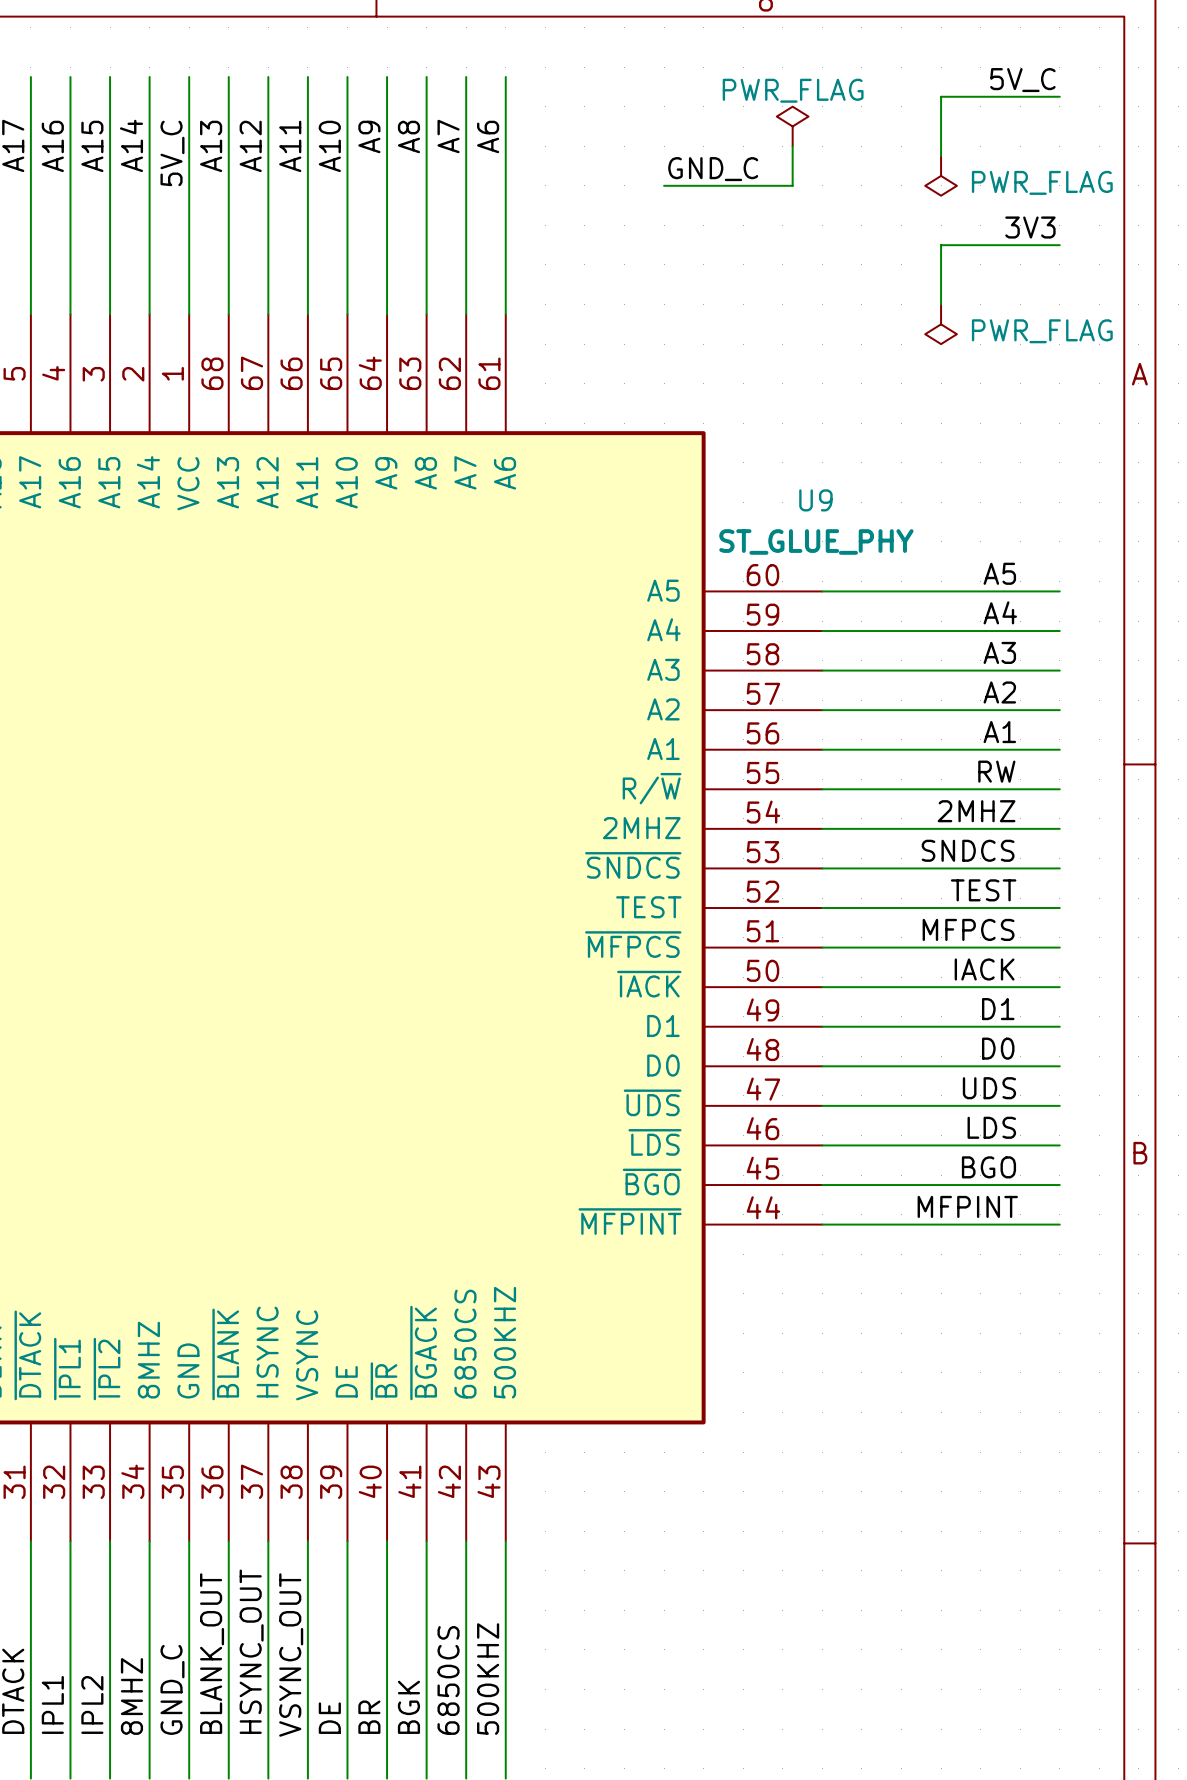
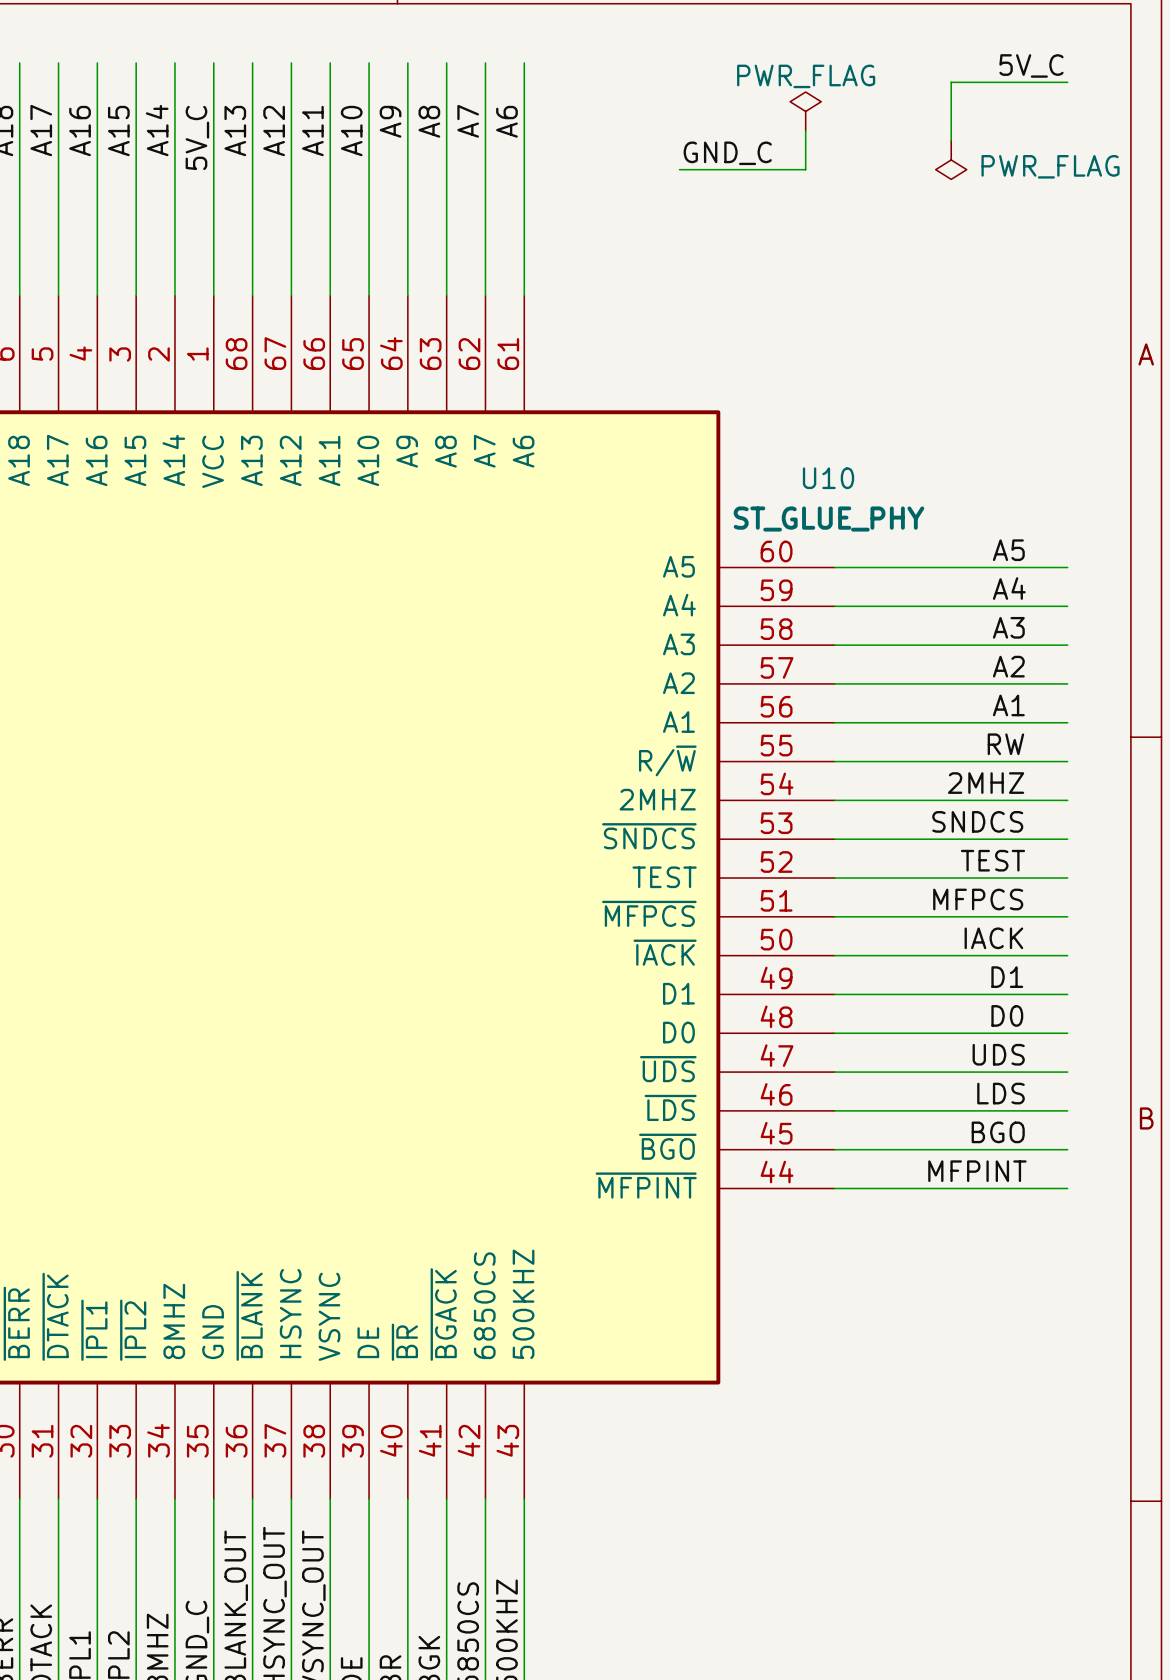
label: 3V3 (1030, 227) -> none
wire: (1059, 245) (941, 245) (941, 304) -> none
power symbol: PWR_FLAG (941, 324) -> none
U9 name: U9 (815, 500) -> U10 (828, 478)

